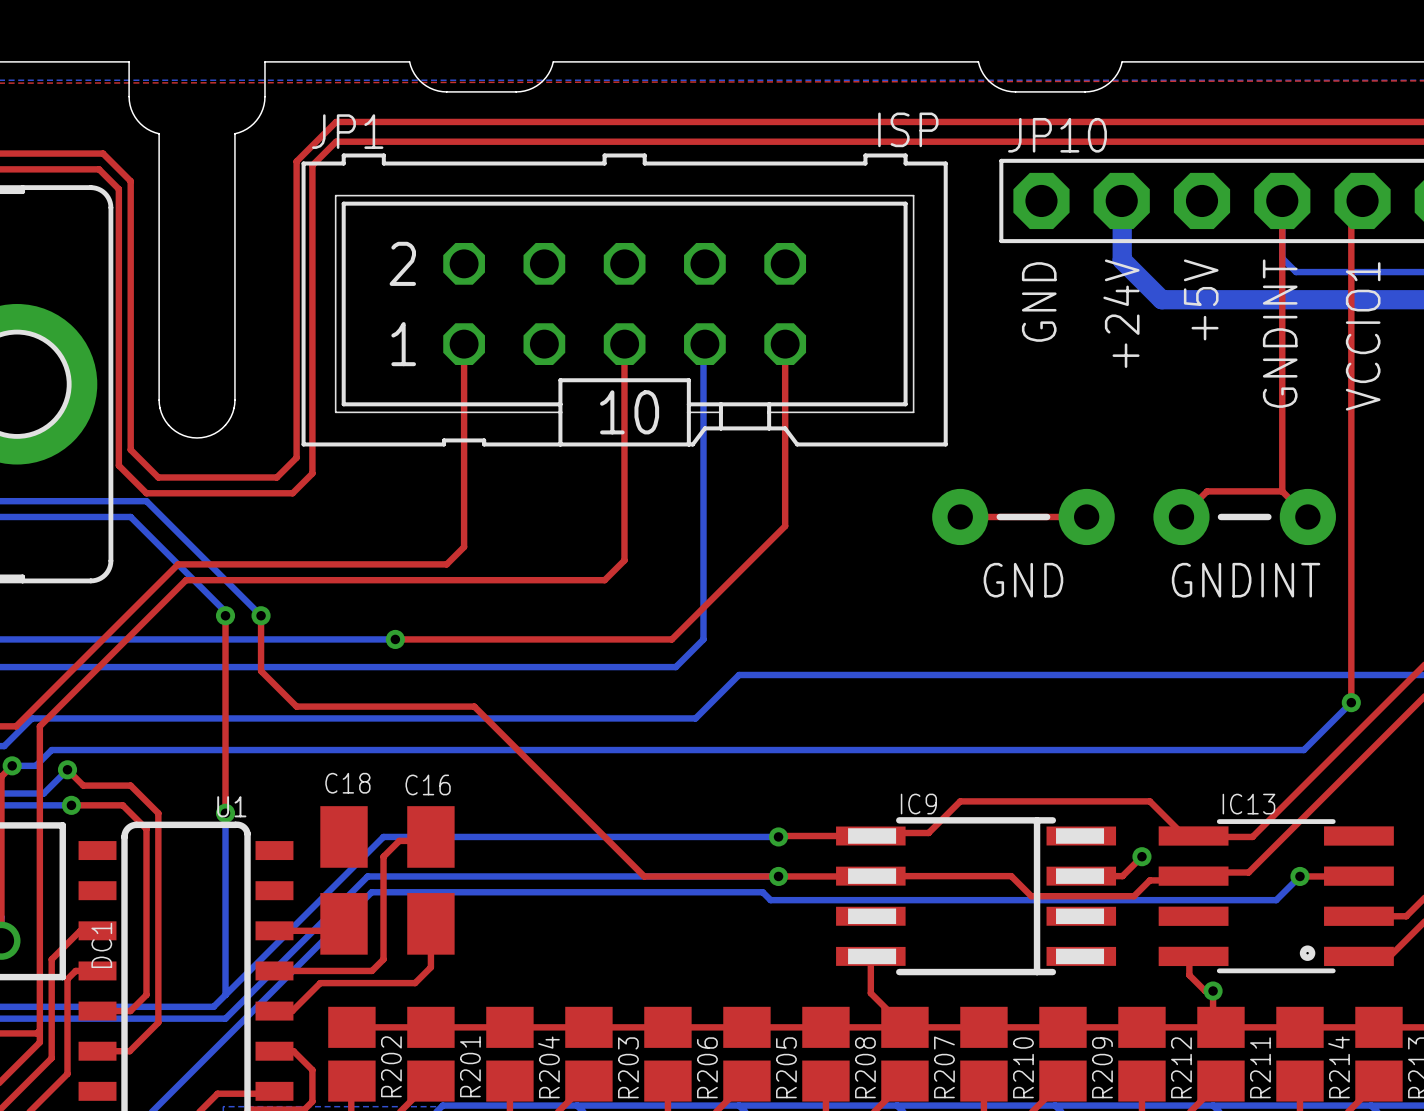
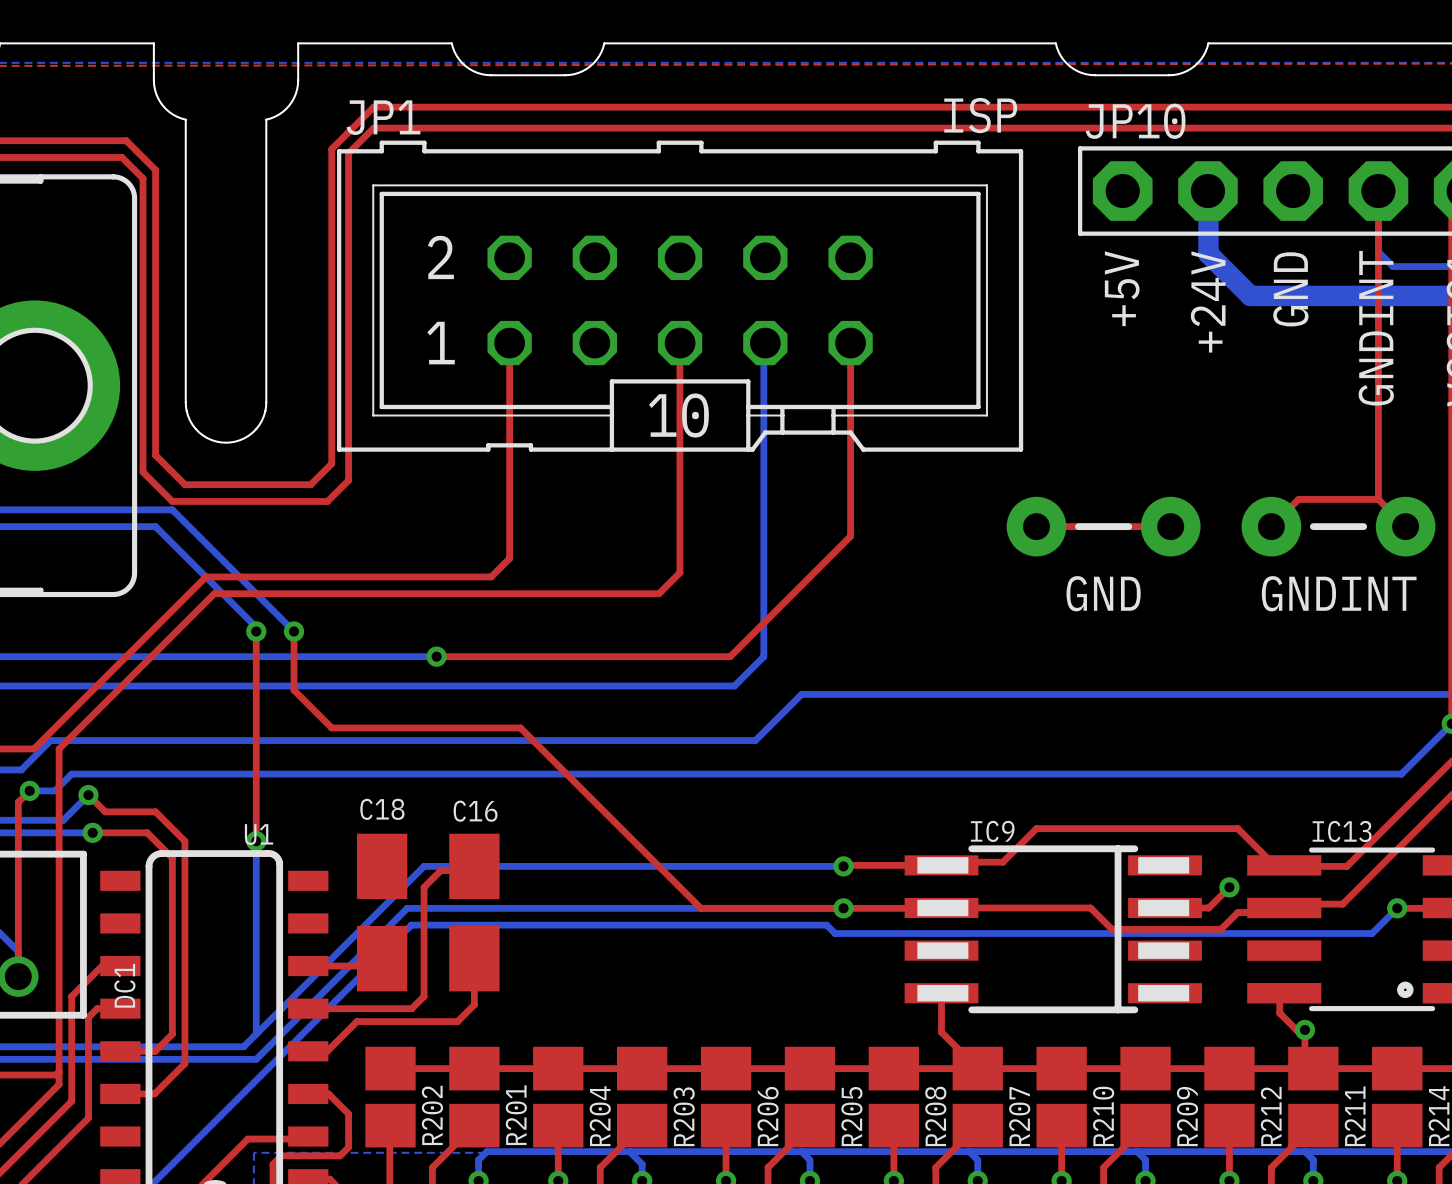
text: +5V (1201, 299) -> GND (1290, 289)
text: GND (1039, 301) -> +5V (1122, 288)

